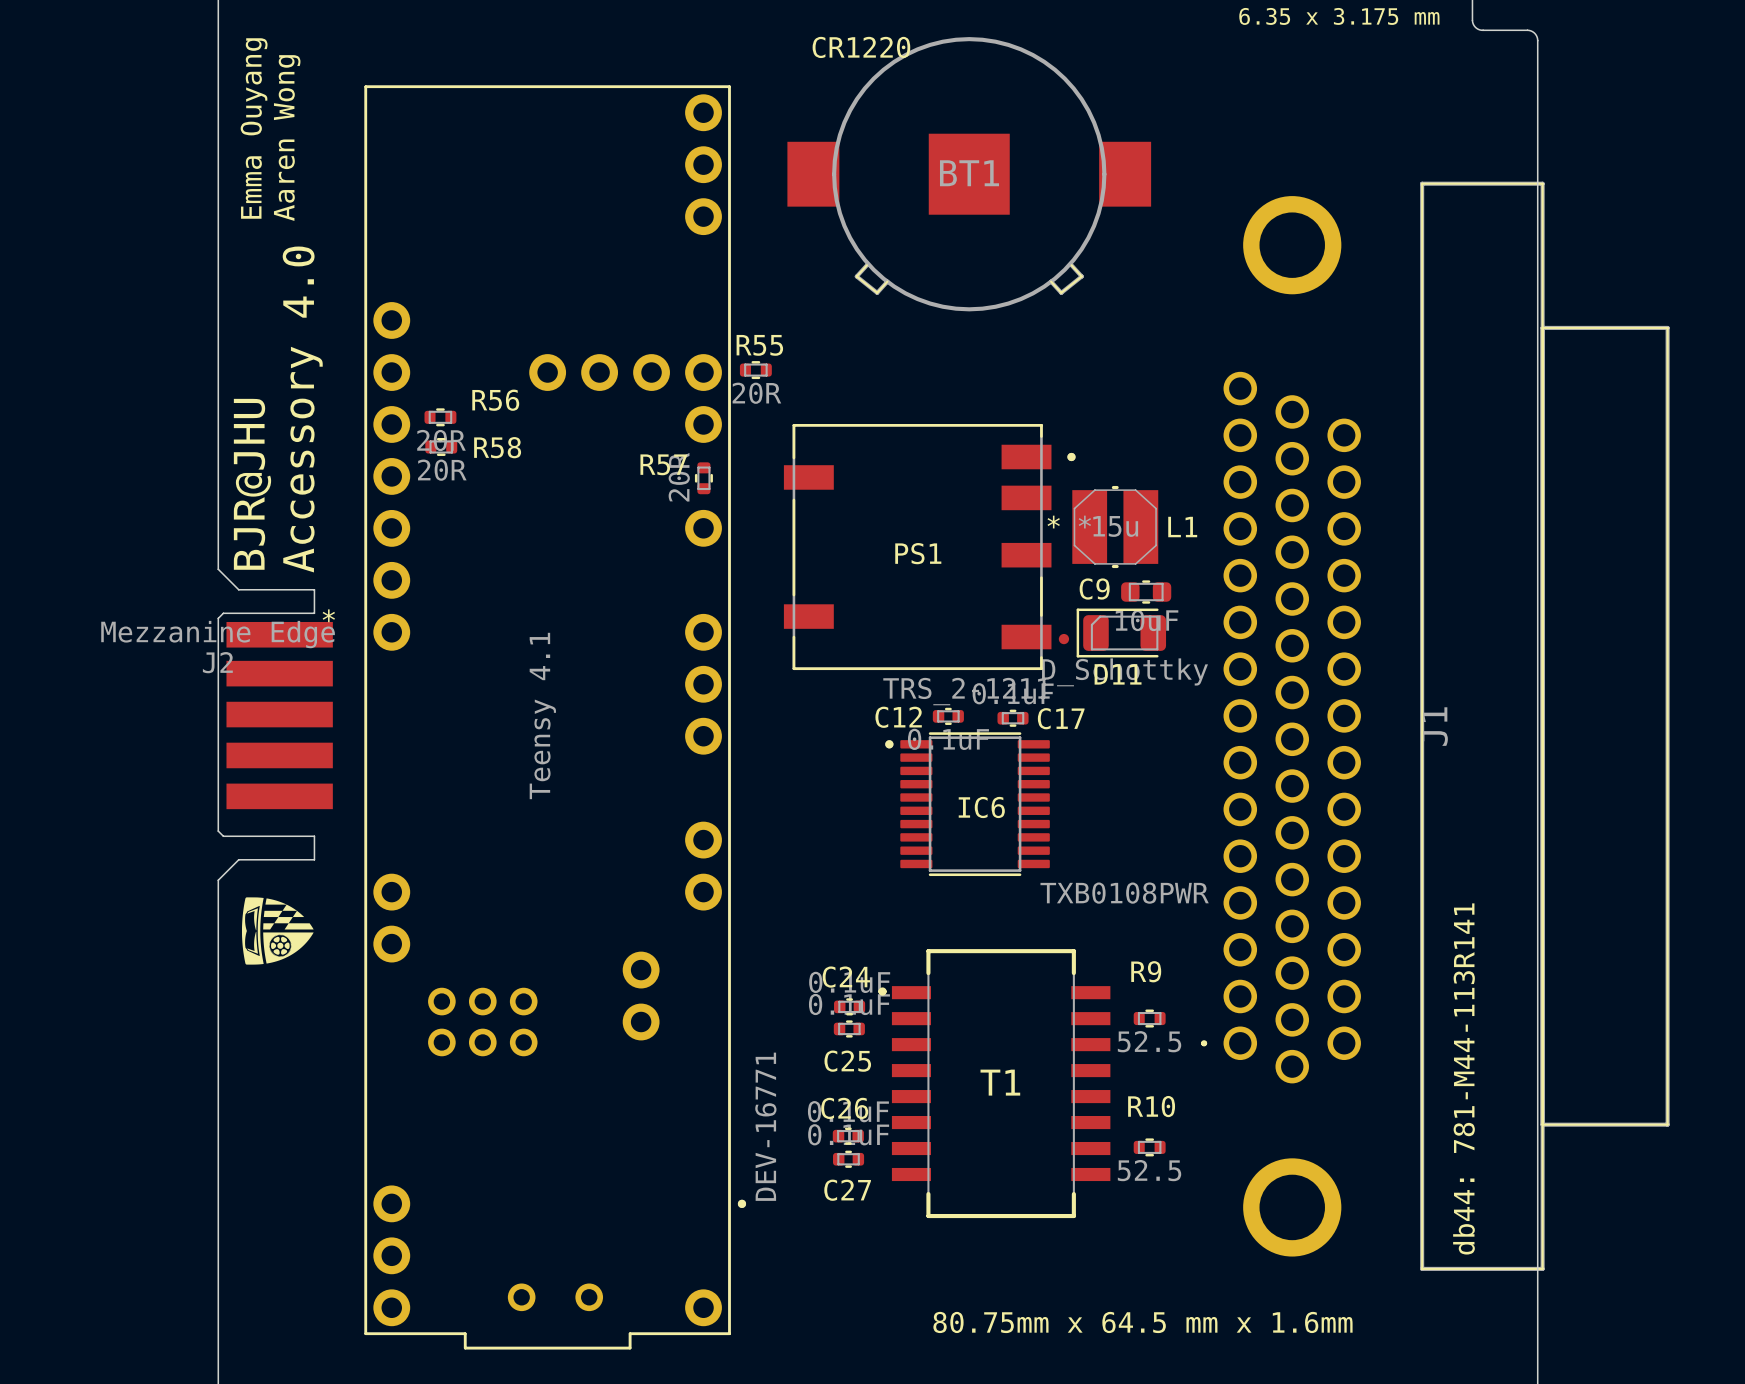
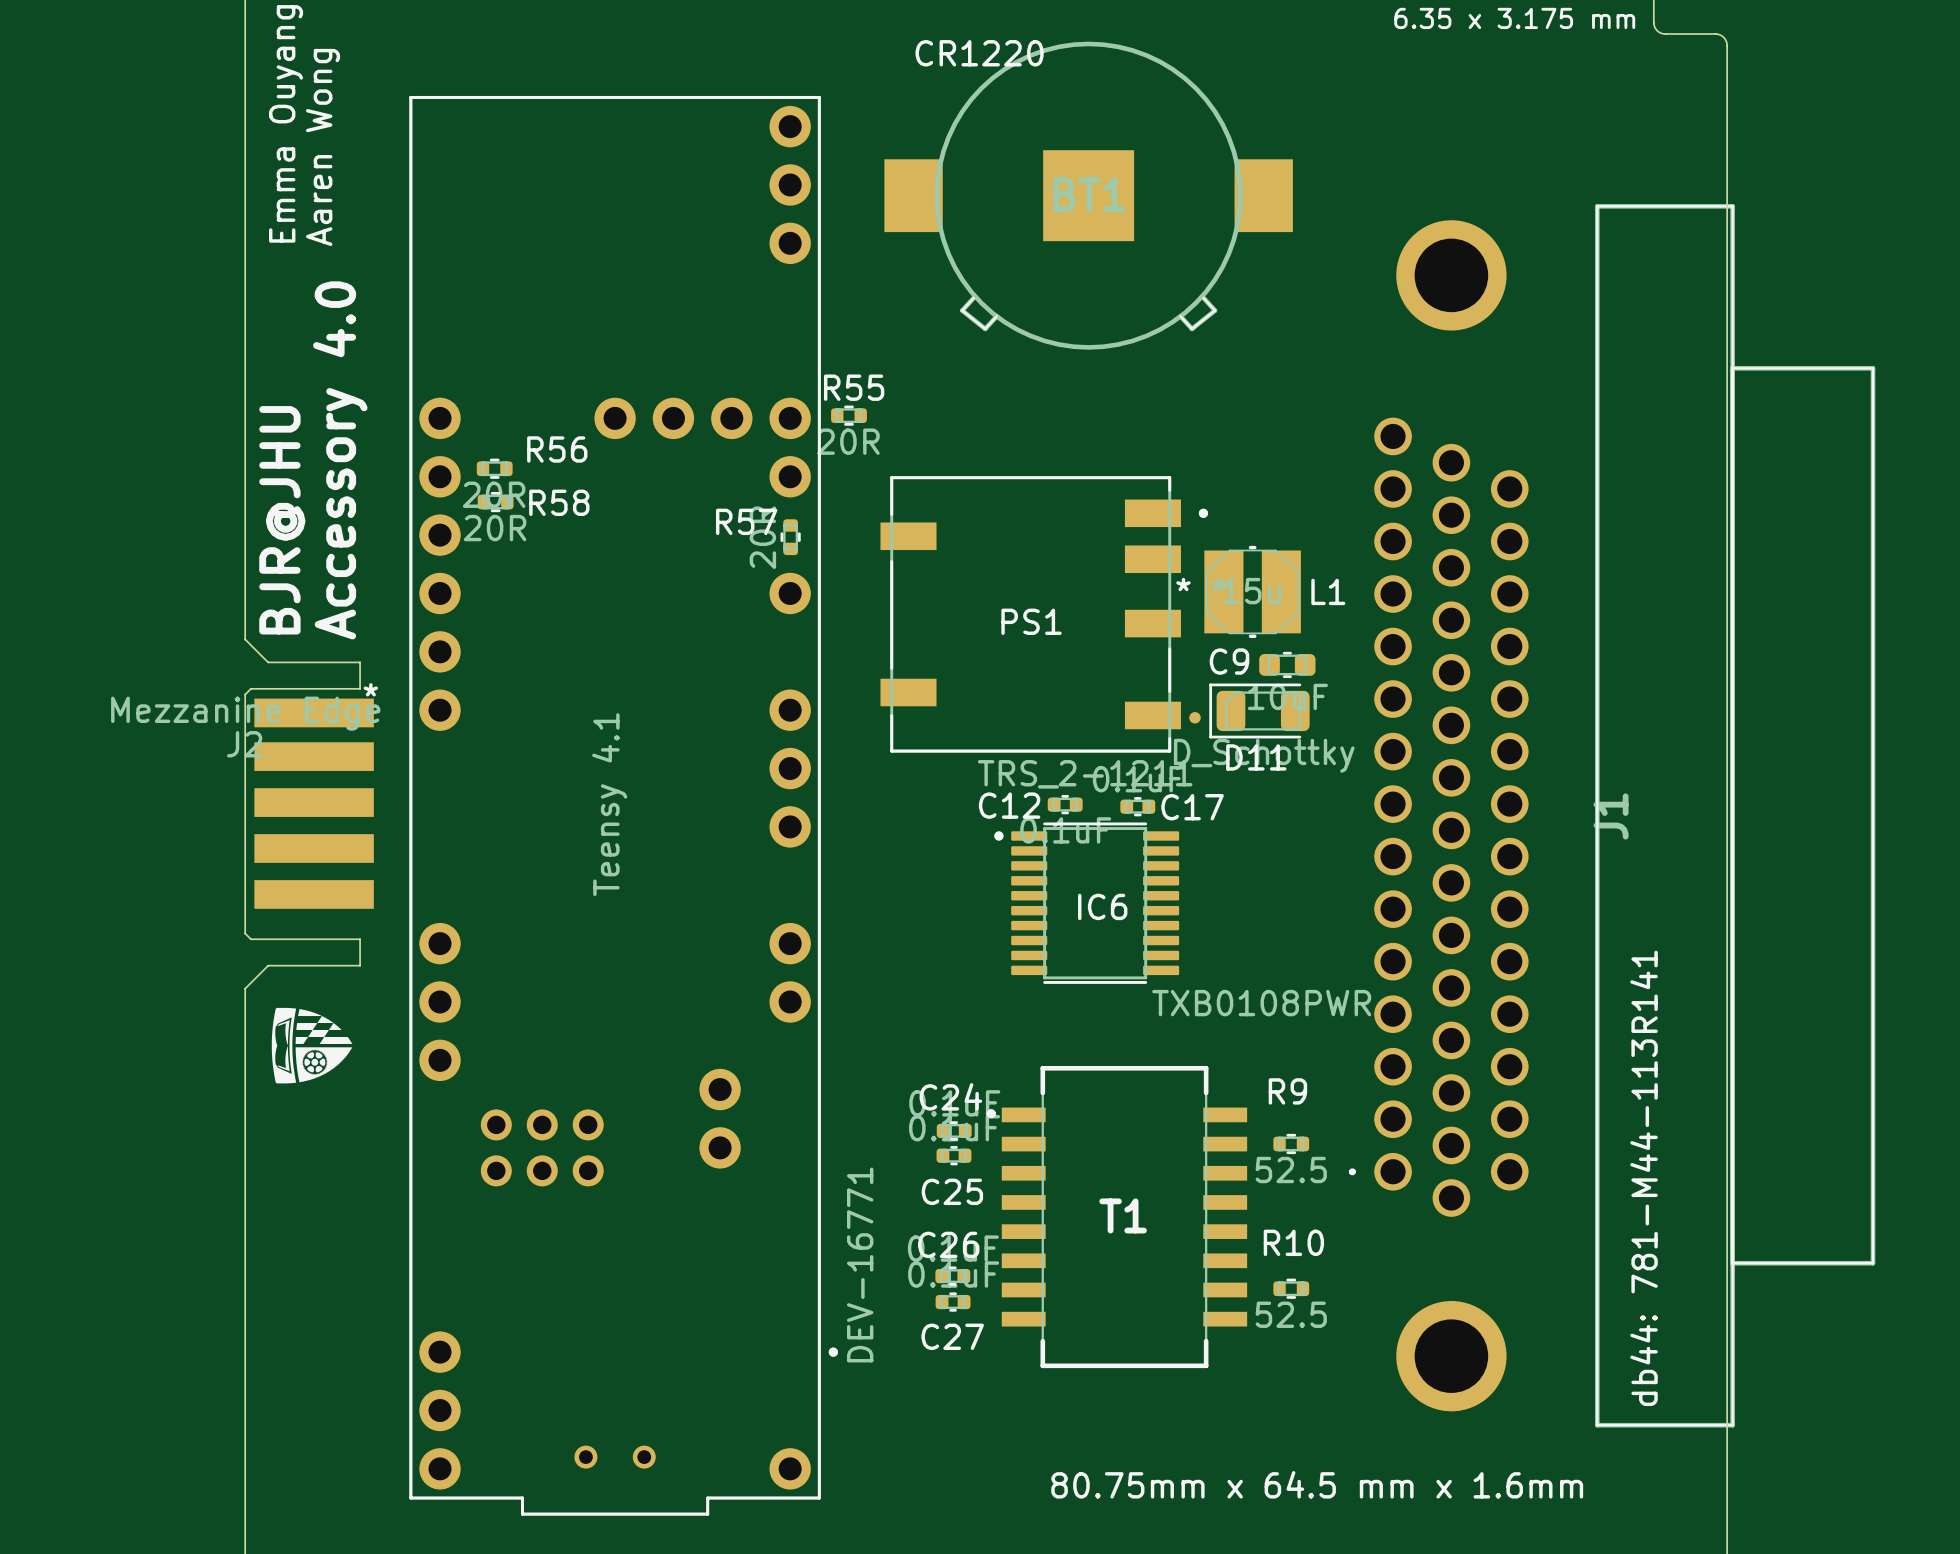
part footprint: [364, 85, 747, 1350] -> [409, 95, 838, 1516]
J2 footprint: [218, 569, 333, 881] -> [245, 639, 374, 989]

